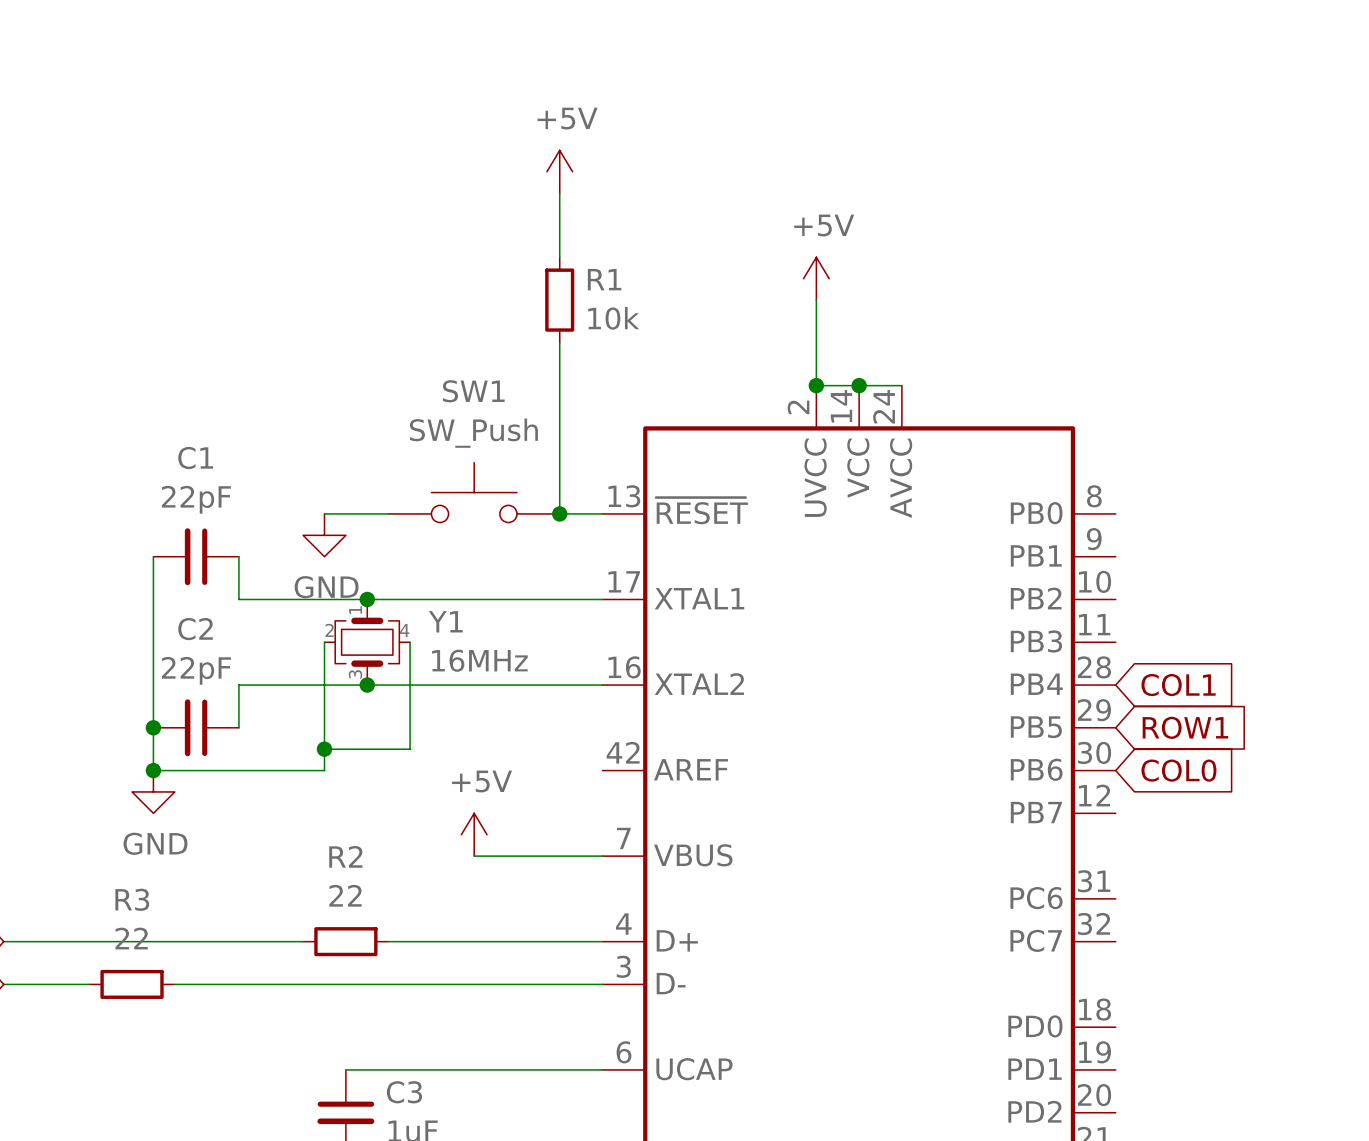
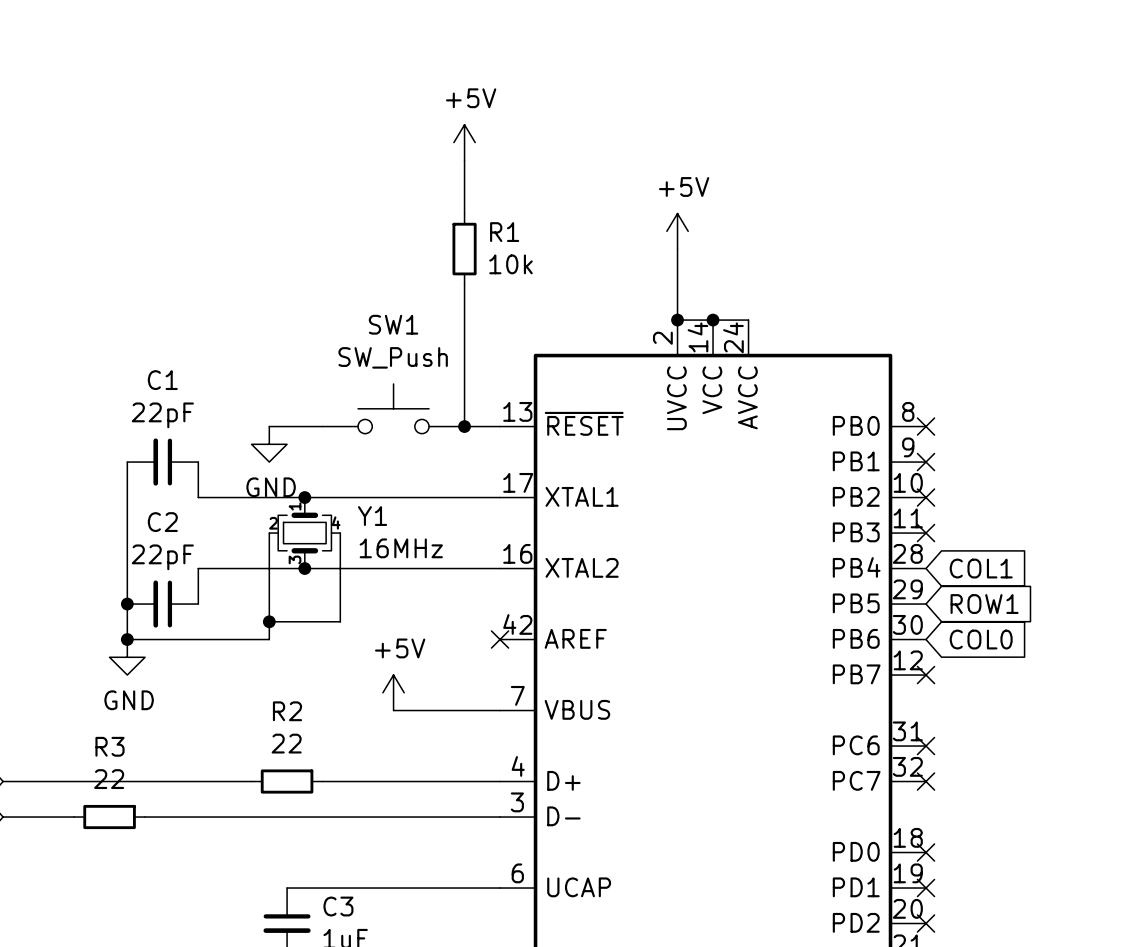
no-connect mark: none -> (926, 426)
no-connect mark: none -> (926, 462)
no-connect mark: none -> (926, 497)
no-connect mark: none -> (926, 533)
no-connect mark: none -> (500, 639)
no-connect mark: none -> (926, 675)
no-connect mark: none -> (926, 746)
no-connect mark: none -> (926, 781)
no-connect mark: none -> (926, 852)
no-connect mark: none -> (926, 888)
no-connect mark: none -> (926, 923)

